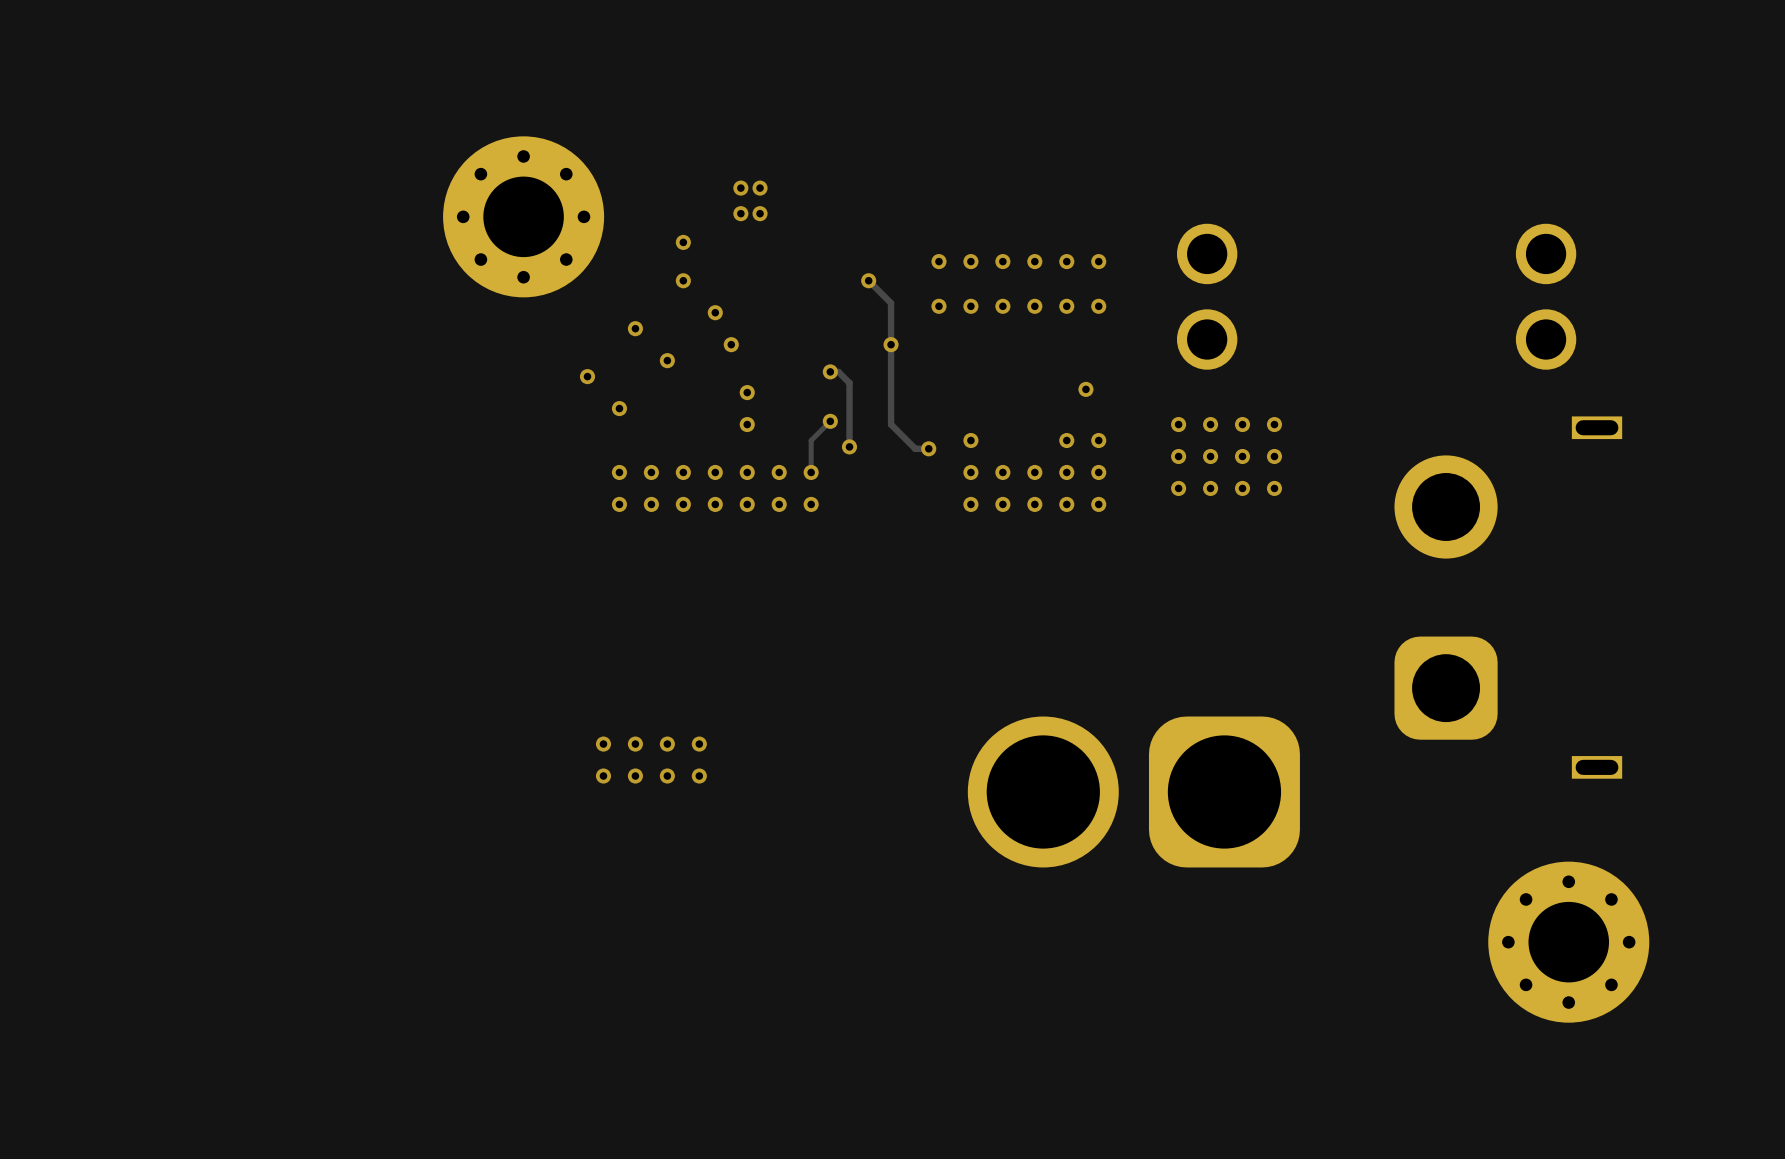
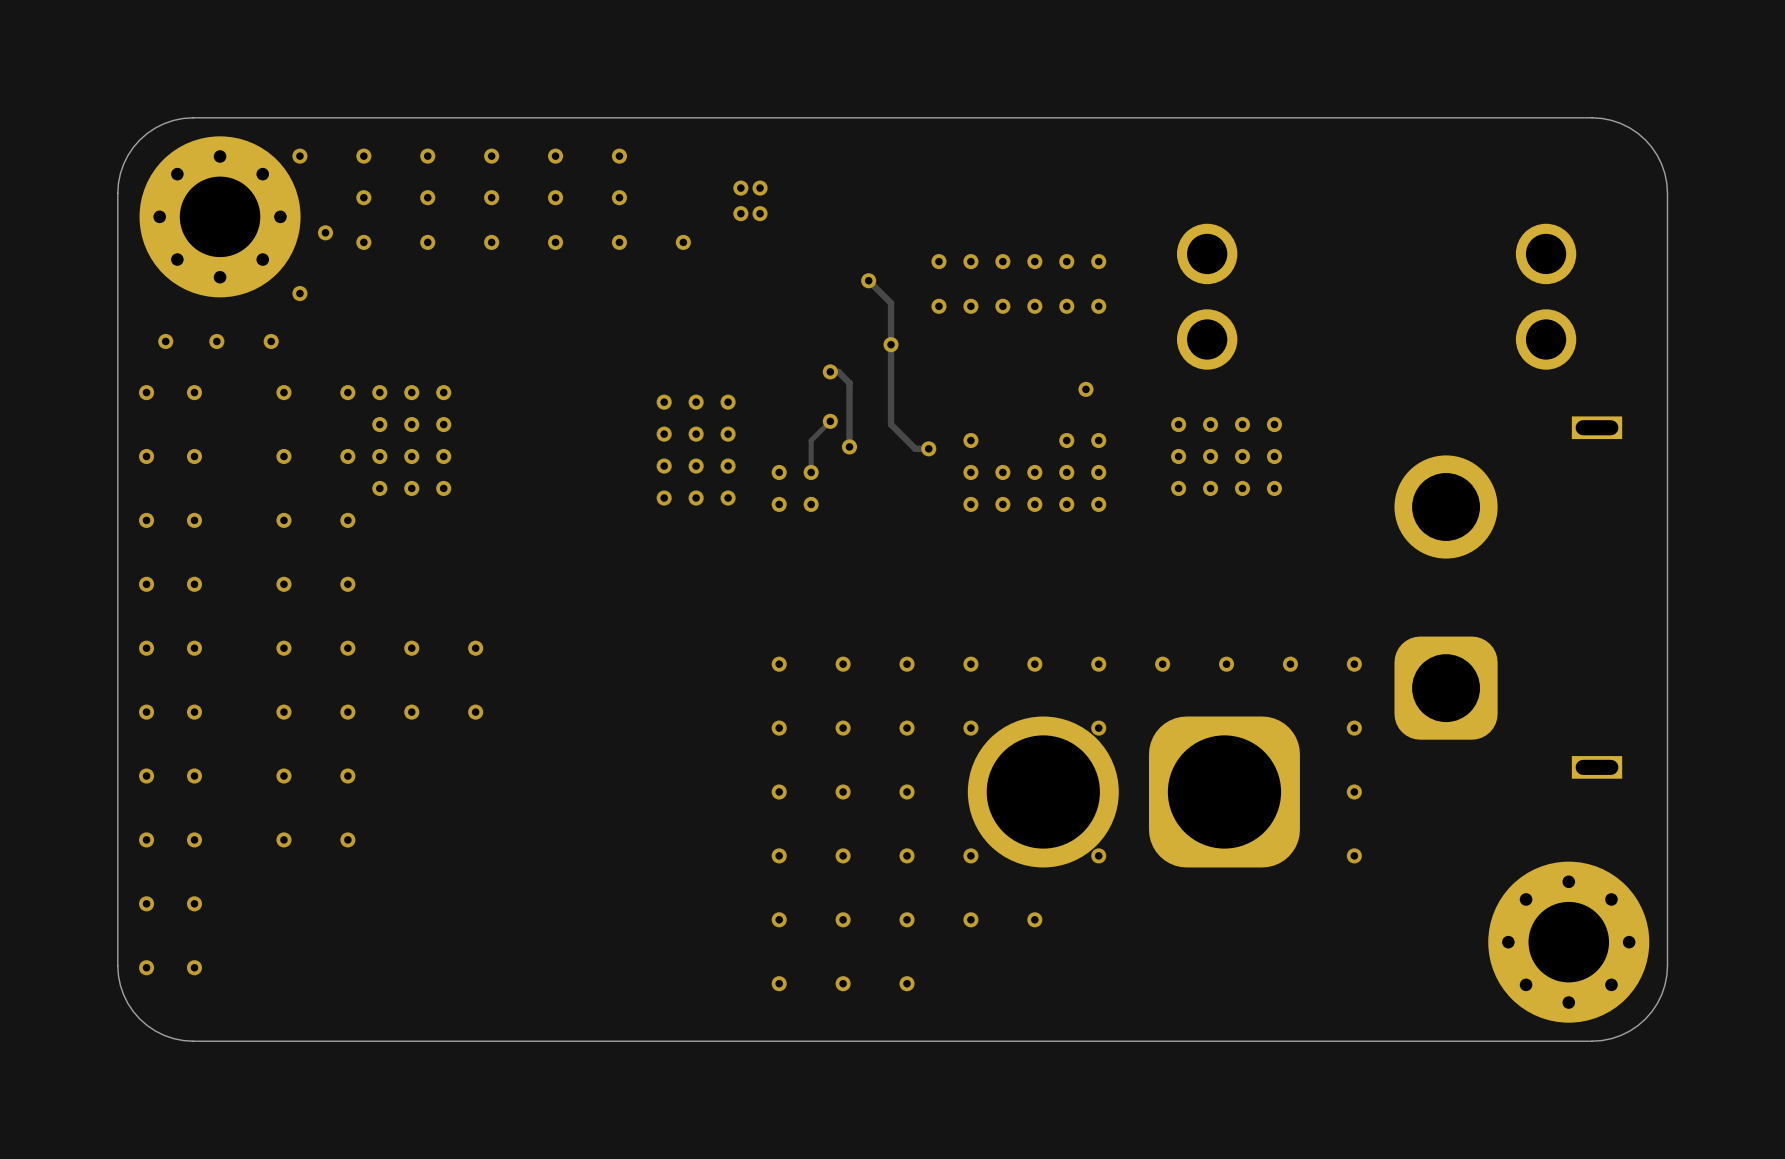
board edge: none -> (1592, 117) (193, 117) (173, 120) (155, 127) (139, 139) (127, 155) (120, 173) (117, 193) (117, 965) (120, 985) (127, 1003) (139, 1019) (155, 1031) (173, 1038) (193, 1041) (1592, 1041) (1611, 1038) (1629, 1031) (1645, 1019) (1657, 1003) (1664, 985) (1667, 965) (1667, 193) (1661, 164) (1645, 139) (1620, 123) (1592, 117)
via: none -> (299, 156)
via: none -> (363, 156)
via: none -> (427, 156)
via: none -> (491, 156)
via: none -> (555, 156)
via: none -> (619, 156)
via: none -> (363, 197)
via: none -> (427, 197)
via: none -> (491, 197)
via: none -> (555, 197)
via: none -> (619, 197)
part position: (523, 216) -> (220, 216)
via: none -> (325, 232)
via: none -> (363, 242)
via: none -> (427, 242)
via: none -> (491, 242)
via: none -> (555, 242)
via: none -> (619, 242)
via: (683, 280) -> none
via: none -> (299, 293)
via: (715, 312) -> none
via: (635, 328) -> none
via: none -> (165, 341)
via: none -> (216, 341)
via: none -> (271, 341)
via: (731, 344) -> none
via: (667, 360) -> none
via: (587, 376) -> none
via: none -> (146, 392)
via: none -> (194, 392)
via: none -> (283, 392)
via: none -> (347, 392)
via: none -> (379, 392)
via: none -> (411, 392)
via: none -> (443, 392)
via: (747, 392) -> none
via: none -> (664, 402)
via: none -> (696, 402)
via: none -> (728, 402)
via: (619, 408) -> none
via: none -> (379, 424)
via: none -> (411, 424)
via: none -> (443, 424)
via: (747, 424) -> none
via: none -> (664, 434)
via: none -> (696, 434)
via: none -> (728, 434)
via: none -> (146, 456)
via: none -> (194, 456)
via: none -> (283, 456)
via: none -> (347, 456)
via: none -> (379, 456)
via: none -> (411, 456)
via: none -> (443, 456)
via: (619, 472) -> none
via position: (651, 472) -> (664, 466)
via position: (683, 472) -> (696, 466)
via position: (715, 472) -> (728, 466)
via: (747, 472) -> none
via: none -> (379, 488)
via: none -> (411, 488)
via: none -> (443, 488)
via: (619, 504) -> none
via position: (651, 504) -> (664, 498)
via position: (683, 504) -> (696, 498)
via position: (715, 504) -> (728, 498)
via: (747, 504) -> none
via: none -> (146, 520)
via: none -> (194, 520)
via: none -> (283, 520)
via: none -> (347, 520)
via: none -> (146, 584)
via: none -> (194, 584)
via: none -> (283, 584)
via: none -> (347, 584)
via: none -> (146, 648)
via: none -> (194, 648)
via: none -> (283, 648)
via: none -> (347, 648)
via: none -> (411, 648)
via: none -> (475, 648)
via: none -> (779, 664)
via: none -> (843, 664)
via: none -> (907, 664)
via: none -> (970, 664)
via: none -> (1034, 664)
via: none -> (1098, 664)
via: none -> (1162, 664)
via: none -> (1226, 664)
via: none -> (1290, 664)
via: none -> (1354, 664)
via: none -> (146, 712)
via: none -> (194, 712)
via: none -> (283, 712)
via: none -> (347, 712)
via: none -> (411, 712)
via: none -> (475, 712)
via: none -> (779, 728)
via: none -> (843, 728)
via: none -> (907, 728)
via: none -> (970, 728)
via: none -> (1098, 728)
via: none -> (1354, 728)
via: (603, 744) -> none
via: (635, 744) -> none
via: (667, 744) -> none
via: (699, 744) -> none
via: none -> (146, 776)
via: none -> (194, 776)
via: none -> (283, 776)
via: none -> (347, 776)
via: (603, 776) -> none
via: (635, 776) -> none
via: (667, 776) -> none
via: (699, 776) -> none
via: none -> (779, 791)
via: none -> (843, 791)
via: none -> (907, 791)
via: none -> (1354, 791)
via: none -> (146, 839)
via: none -> (194, 839)
via: none -> (283, 839)
via: none -> (347, 839)
via: none -> (779, 855)
via: none -> (843, 855)
via: none -> (907, 855)
via: none -> (970, 855)
via: none -> (1098, 855)
via: none -> (1354, 855)
via: none -> (146, 903)
via: none -> (194, 903)
via: none -> (779, 919)
via: none -> (843, 919)
via: none -> (907, 919)
via: none -> (970, 919)
via: none -> (1034, 919)
via: none -> (146, 967)
via: none -> (194, 967)
via: none -> (779, 983)
via: none -> (843, 983)
via: none -> (907, 983)

